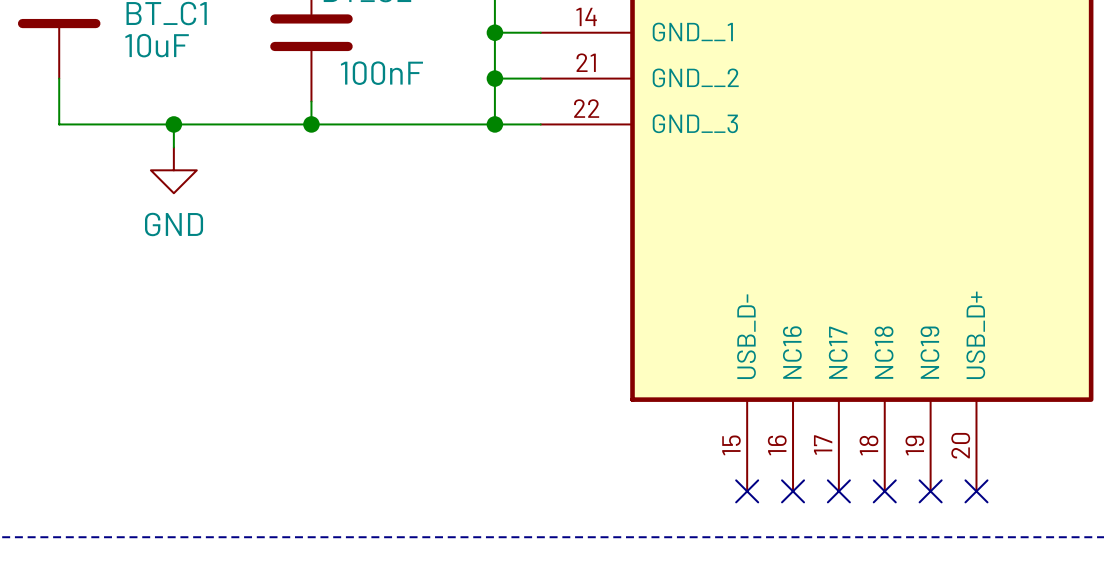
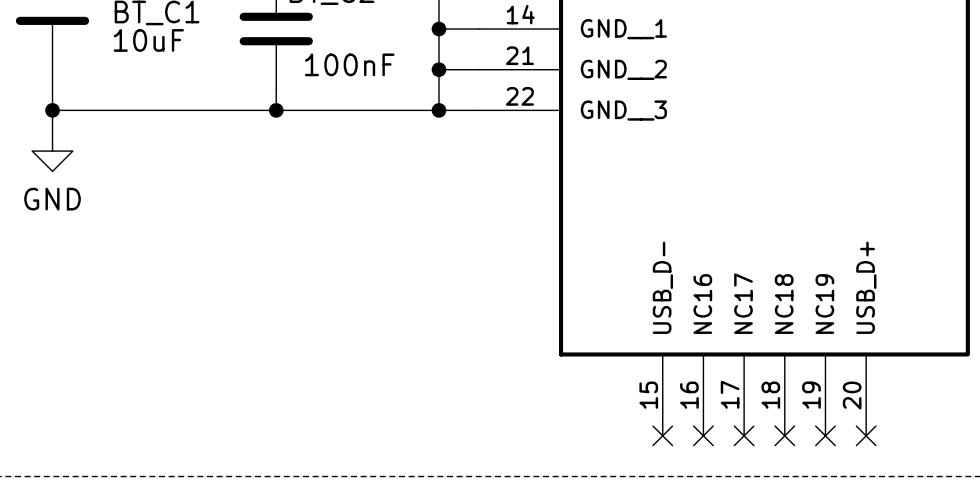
junction: none -> (52, 110)
wire: (173, 124) (173, 147) -> (52, 110) (52, 130)
junction: (173, 124) -> none
power symbol position: GND (173, 170) -> GND (52, 151)

